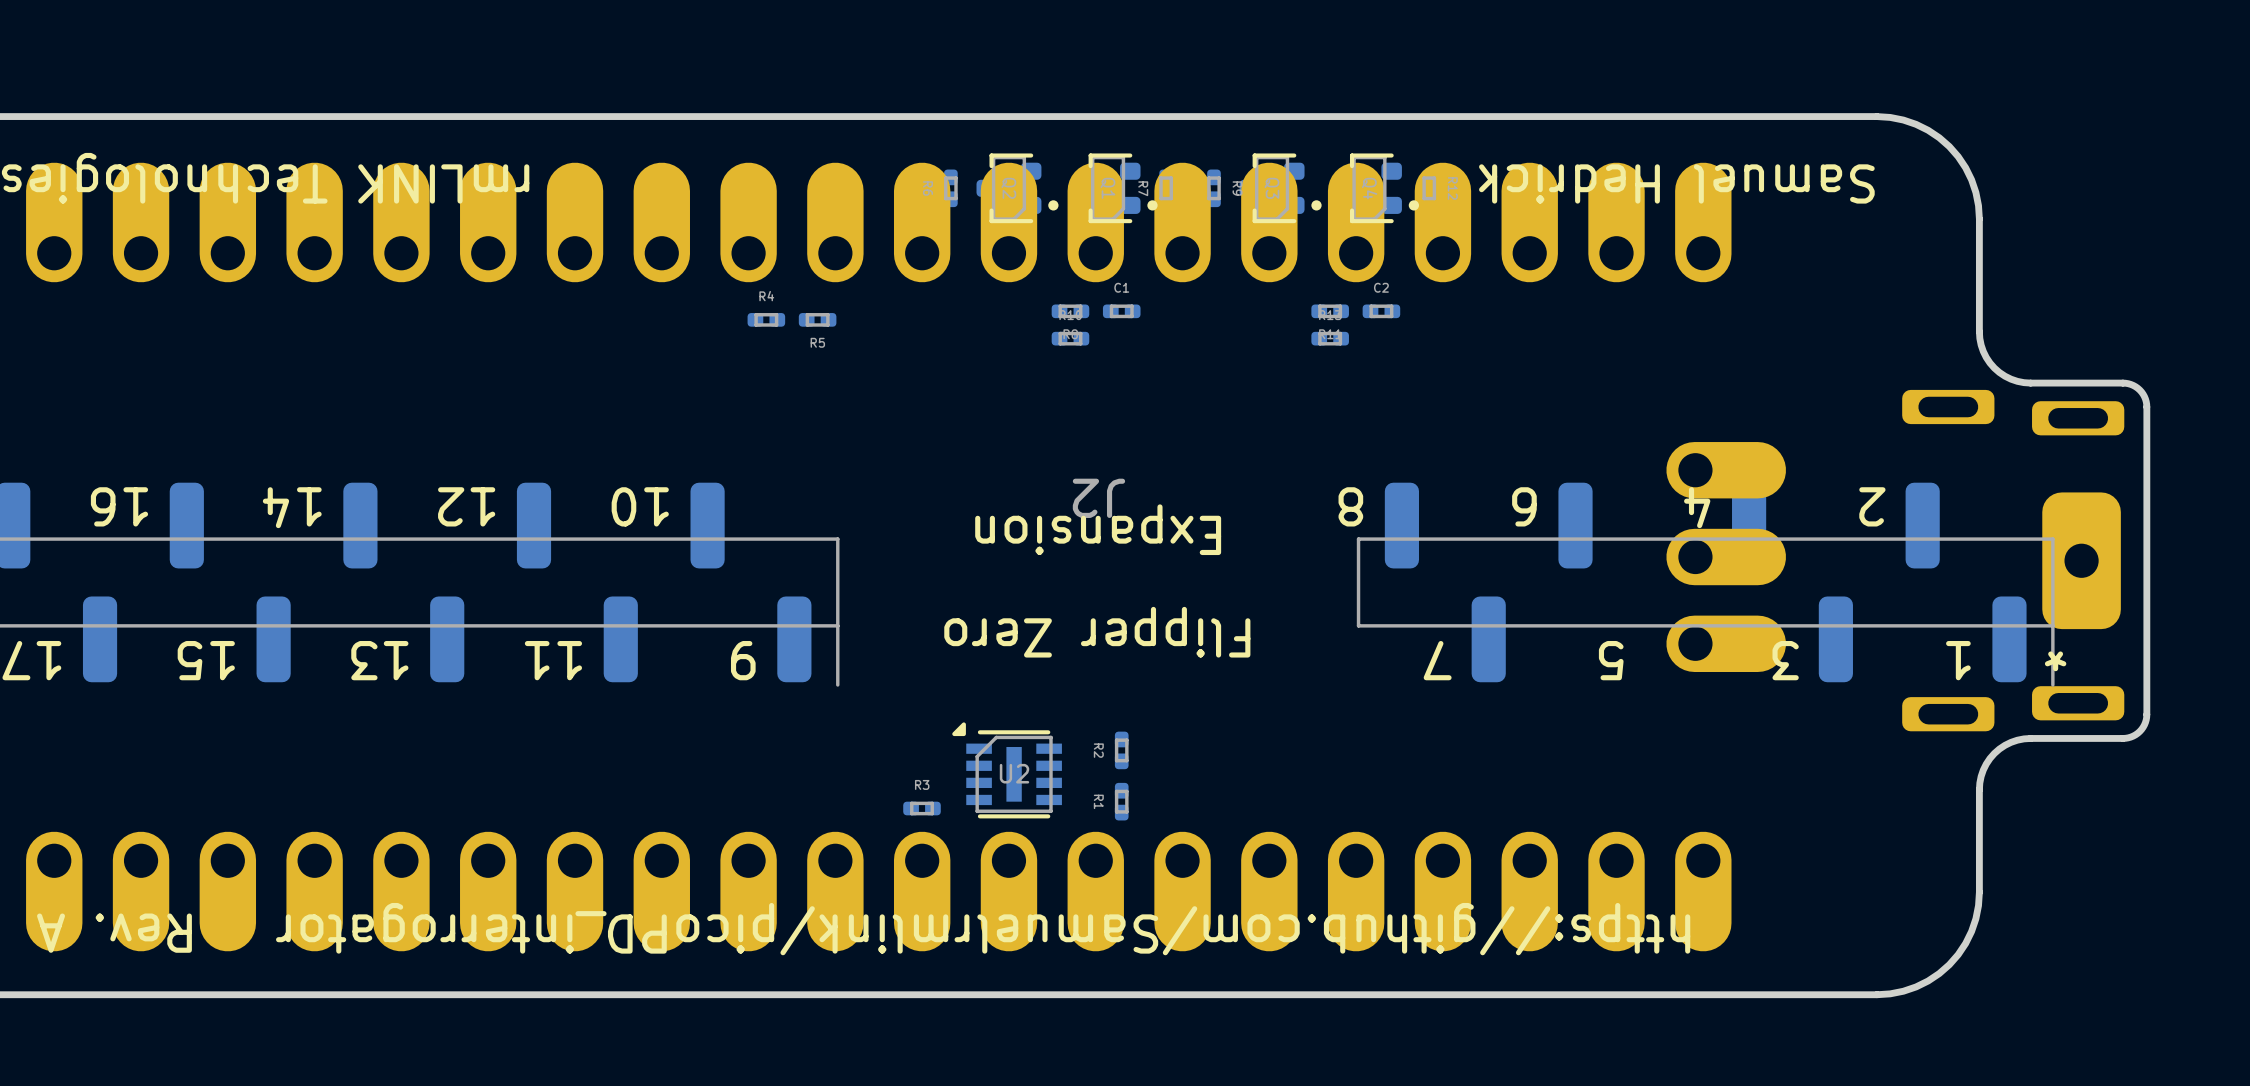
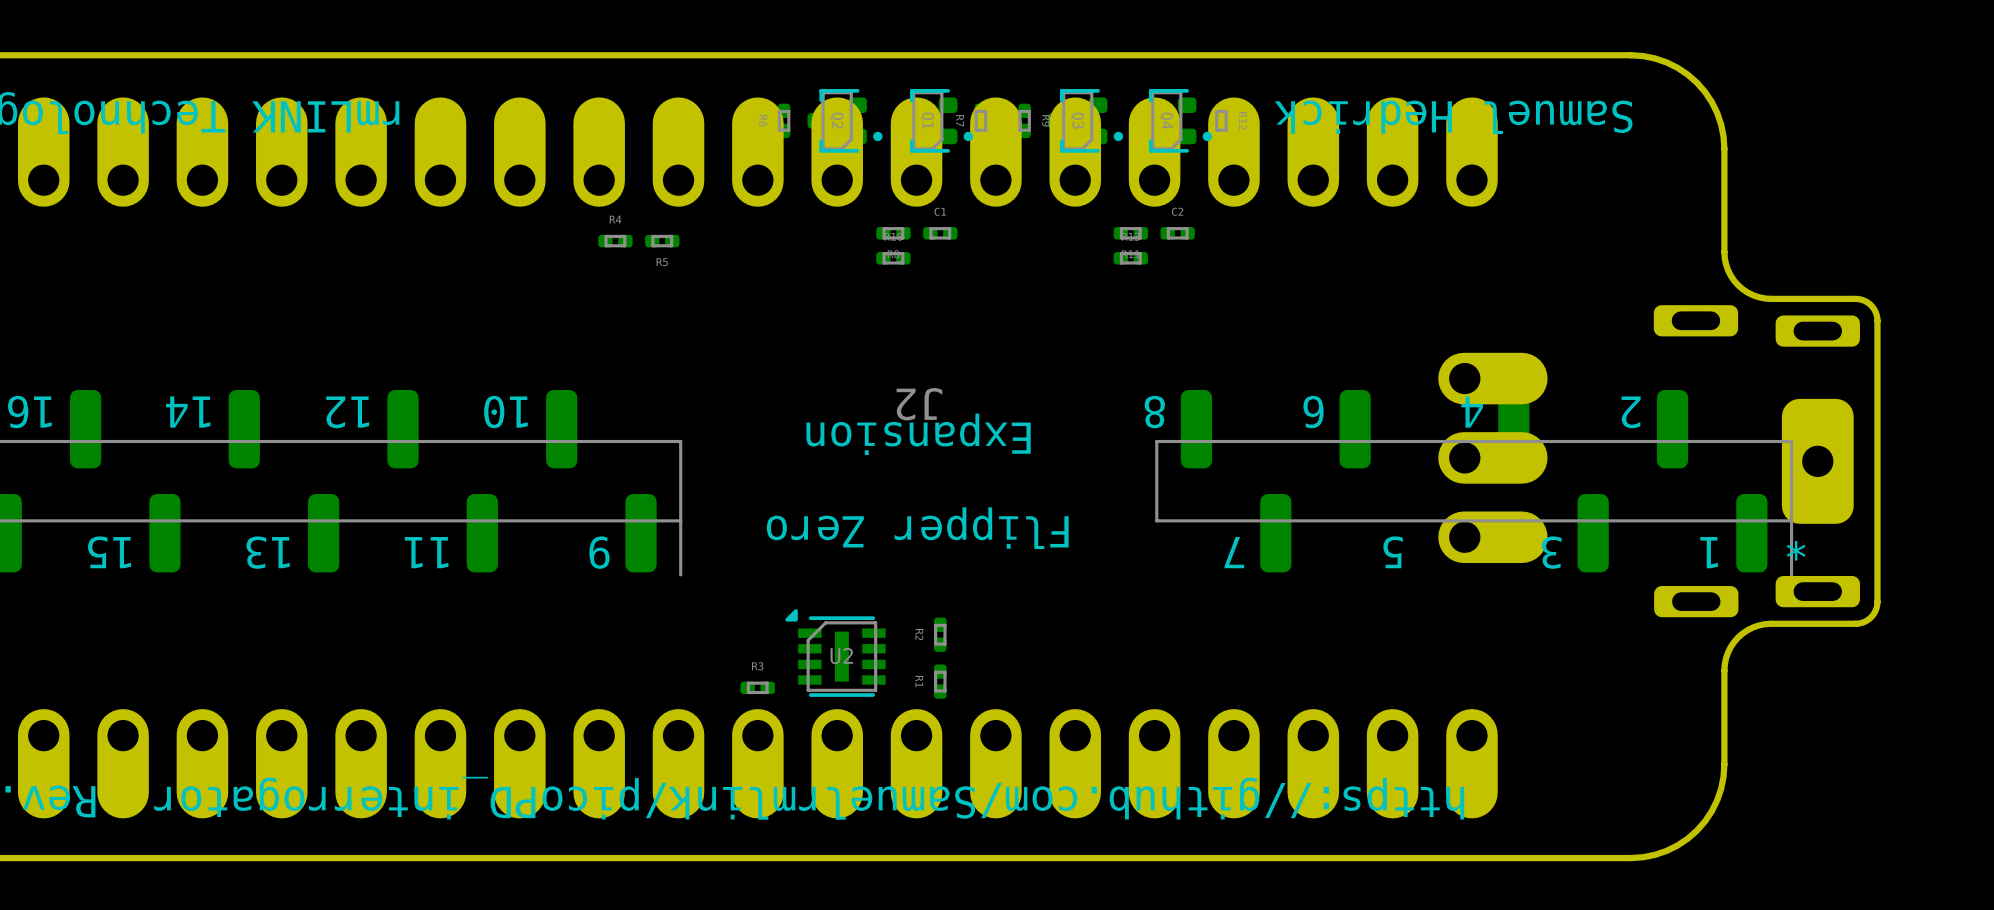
part footprint: [1902, 389, 2125, 732] -> [1653, 305, 1860, 618]

